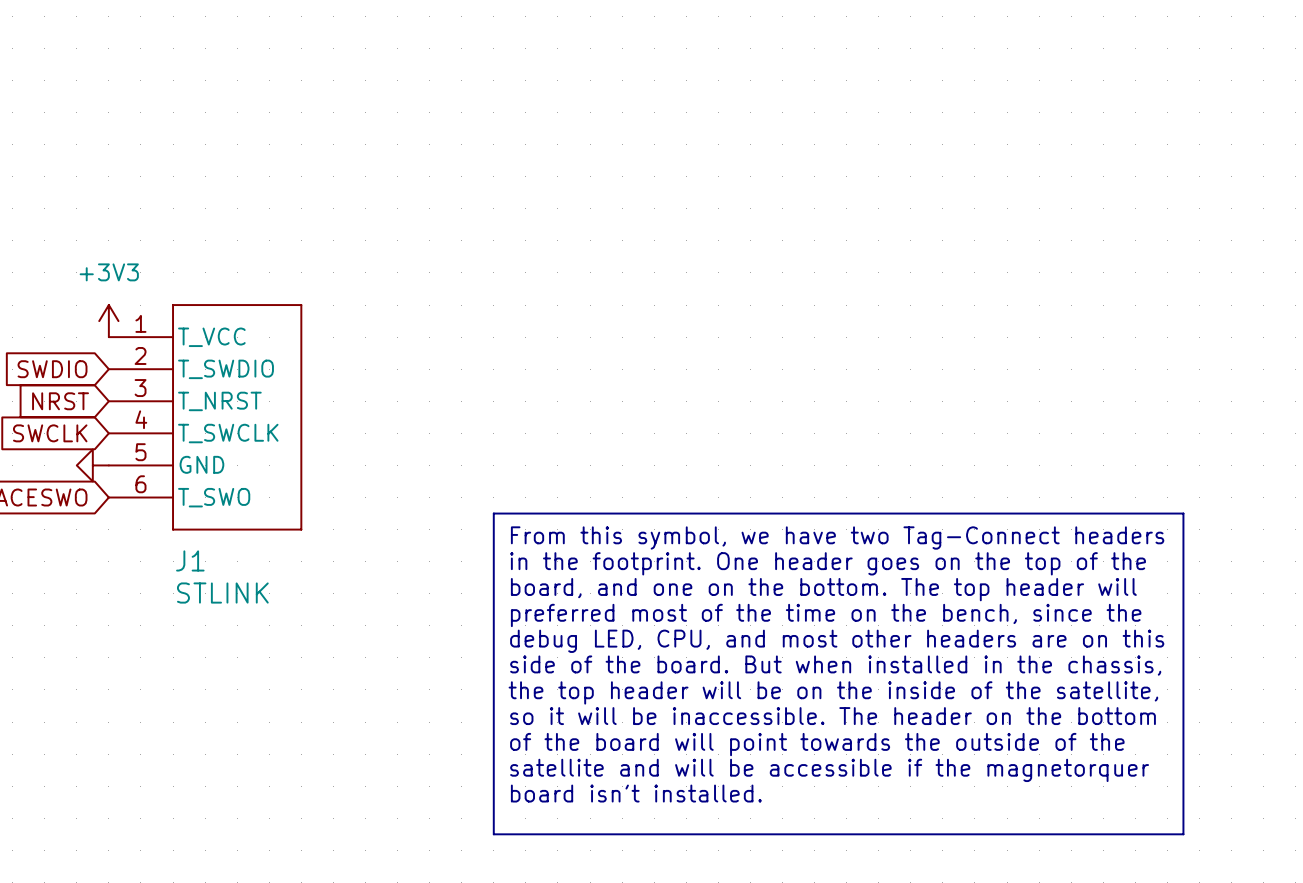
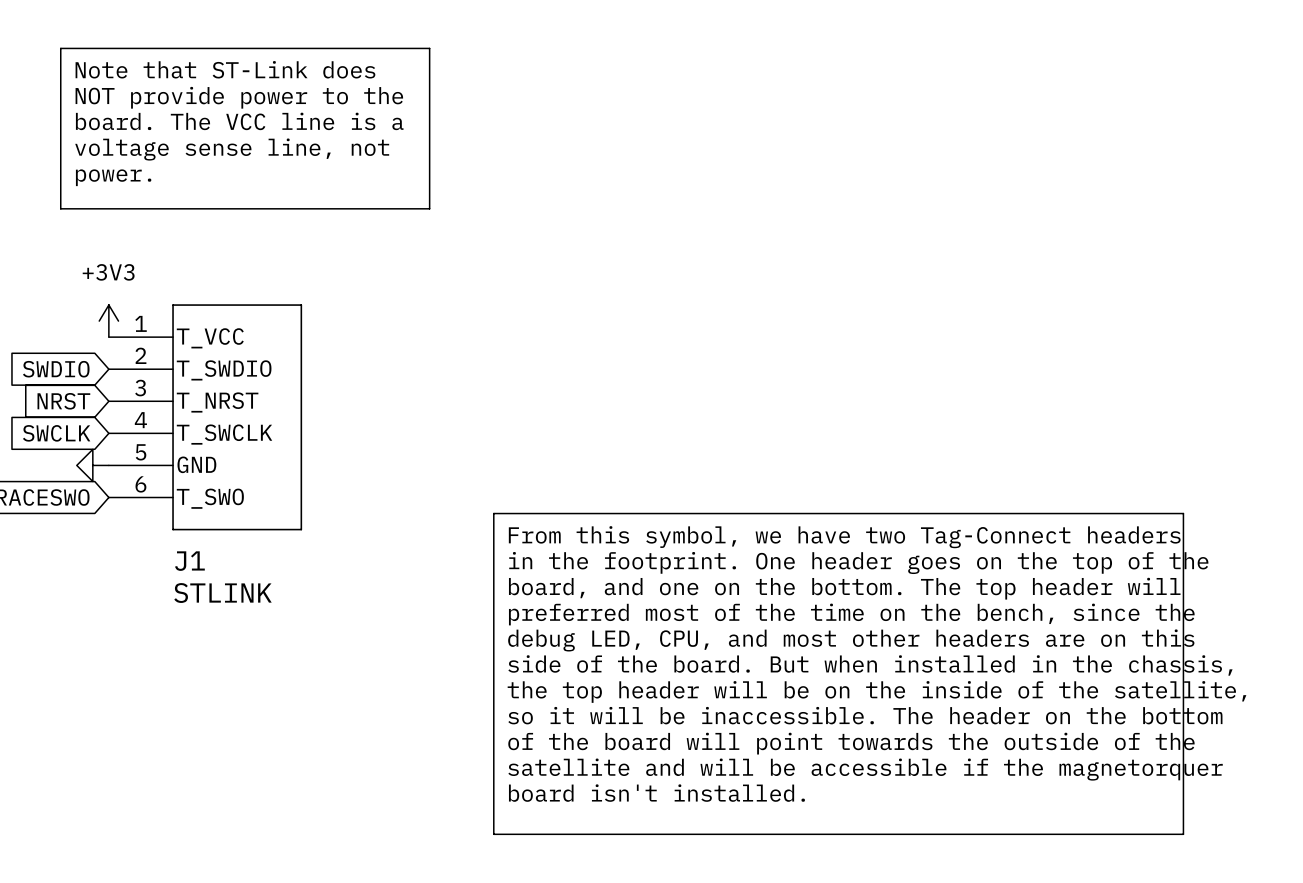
line: none -> (60, 48) (429, 48) (429, 208) (60, 208) (60, 48)
text: none -> Note that ST-Link does (225, 69)
text: none -> NOT provide power to the (239, 97)
text: none -> board. The VCC line is a (239, 121)
text: none -> voltage sense line, not (232, 149)
text: none -> power. (113, 177)

